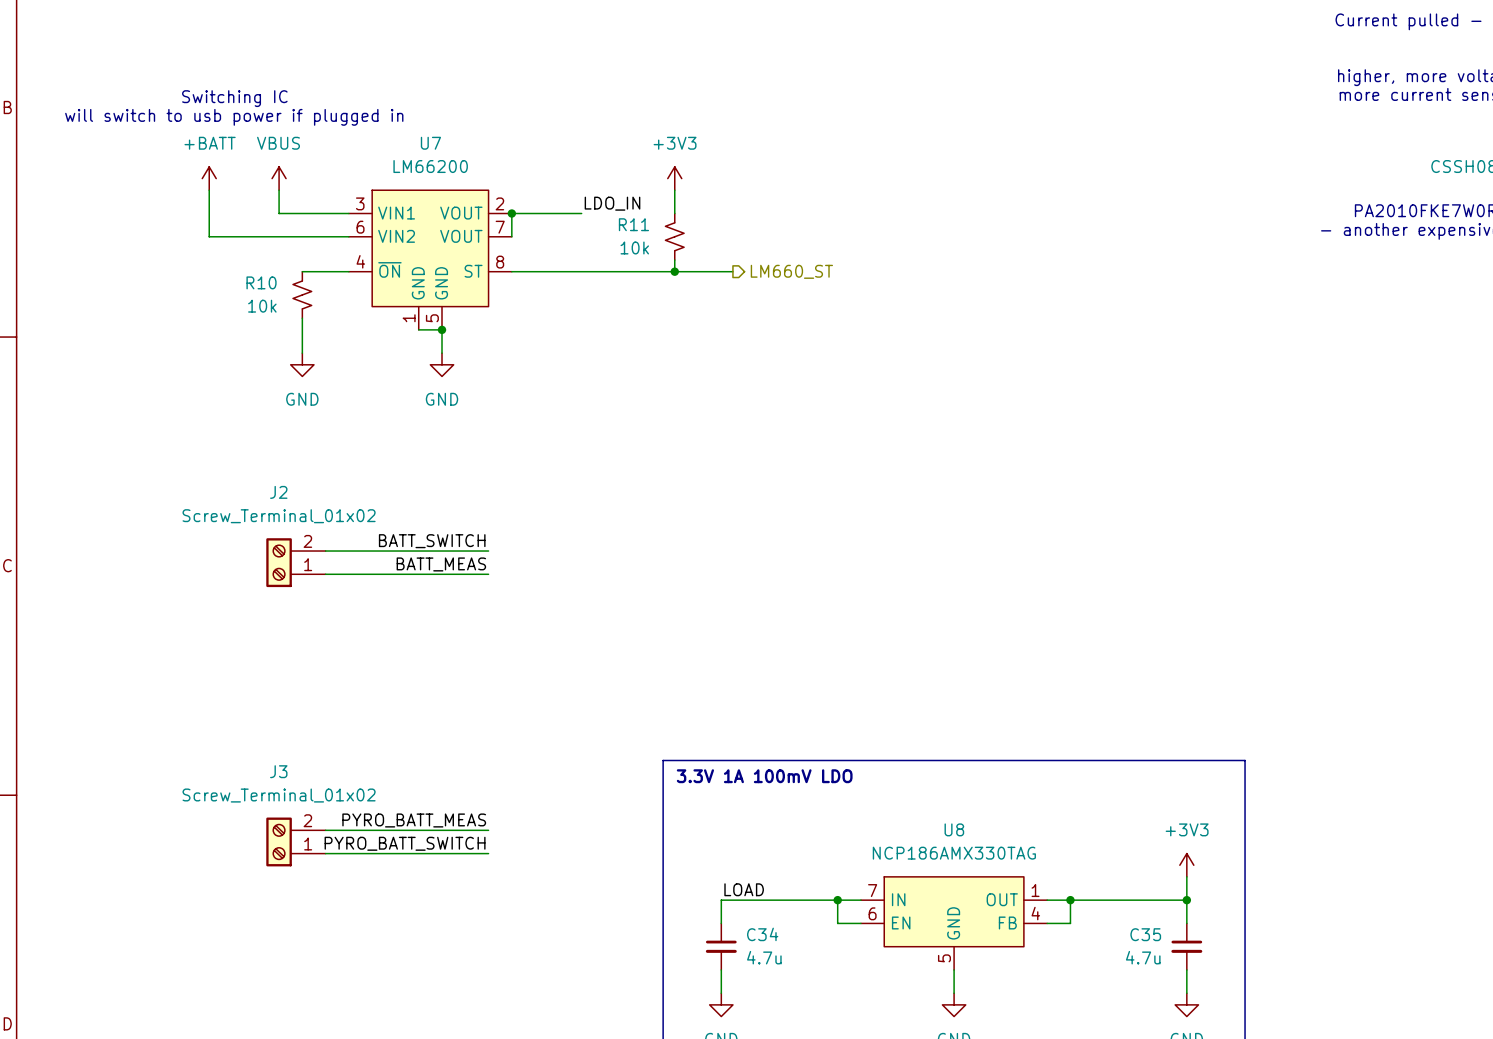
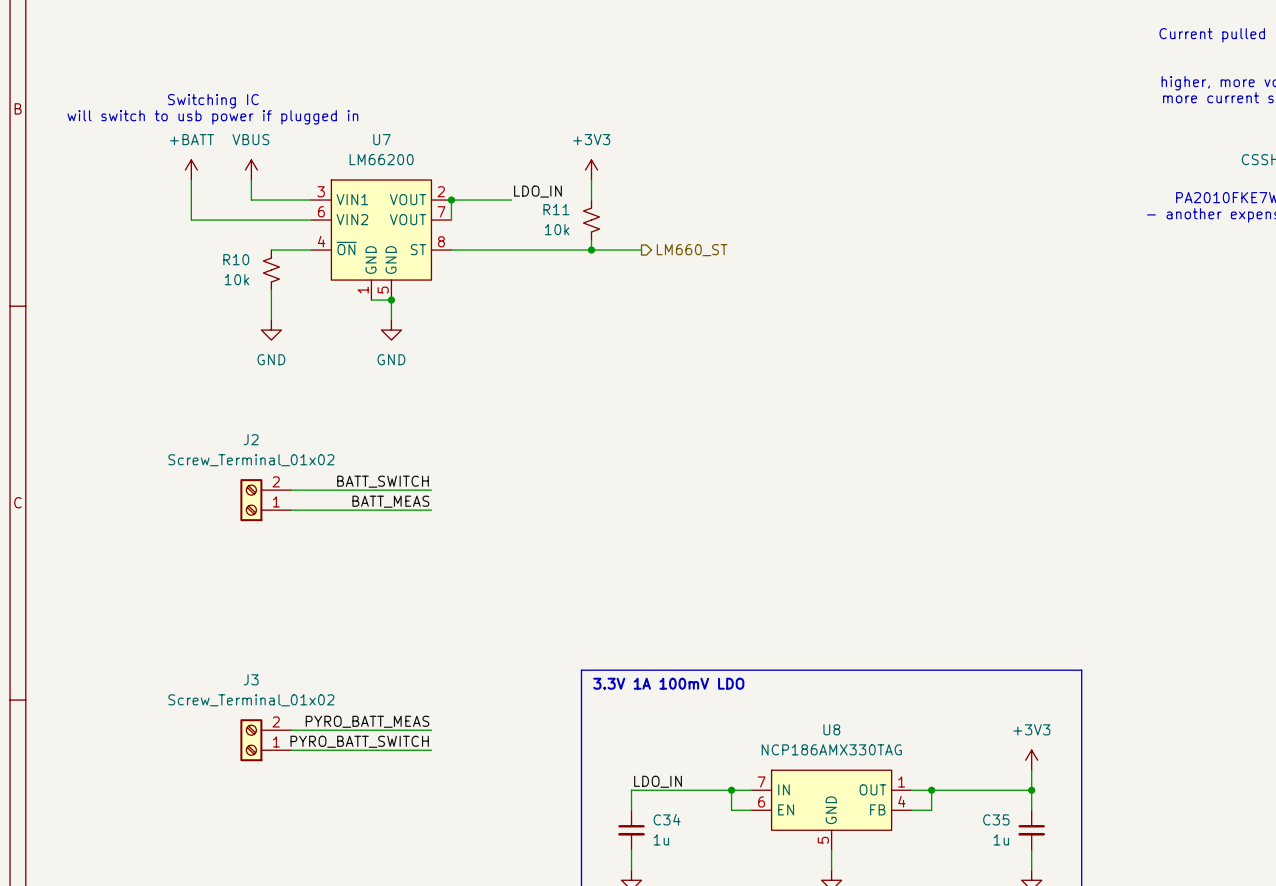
label: LOAD (744, 889) -> LDO_IN (658, 781)
C34 value: 4.7u (764, 957) -> 1u (661, 839)
C35 value: 4.7u (1143, 957) -> 1u (1001, 839)

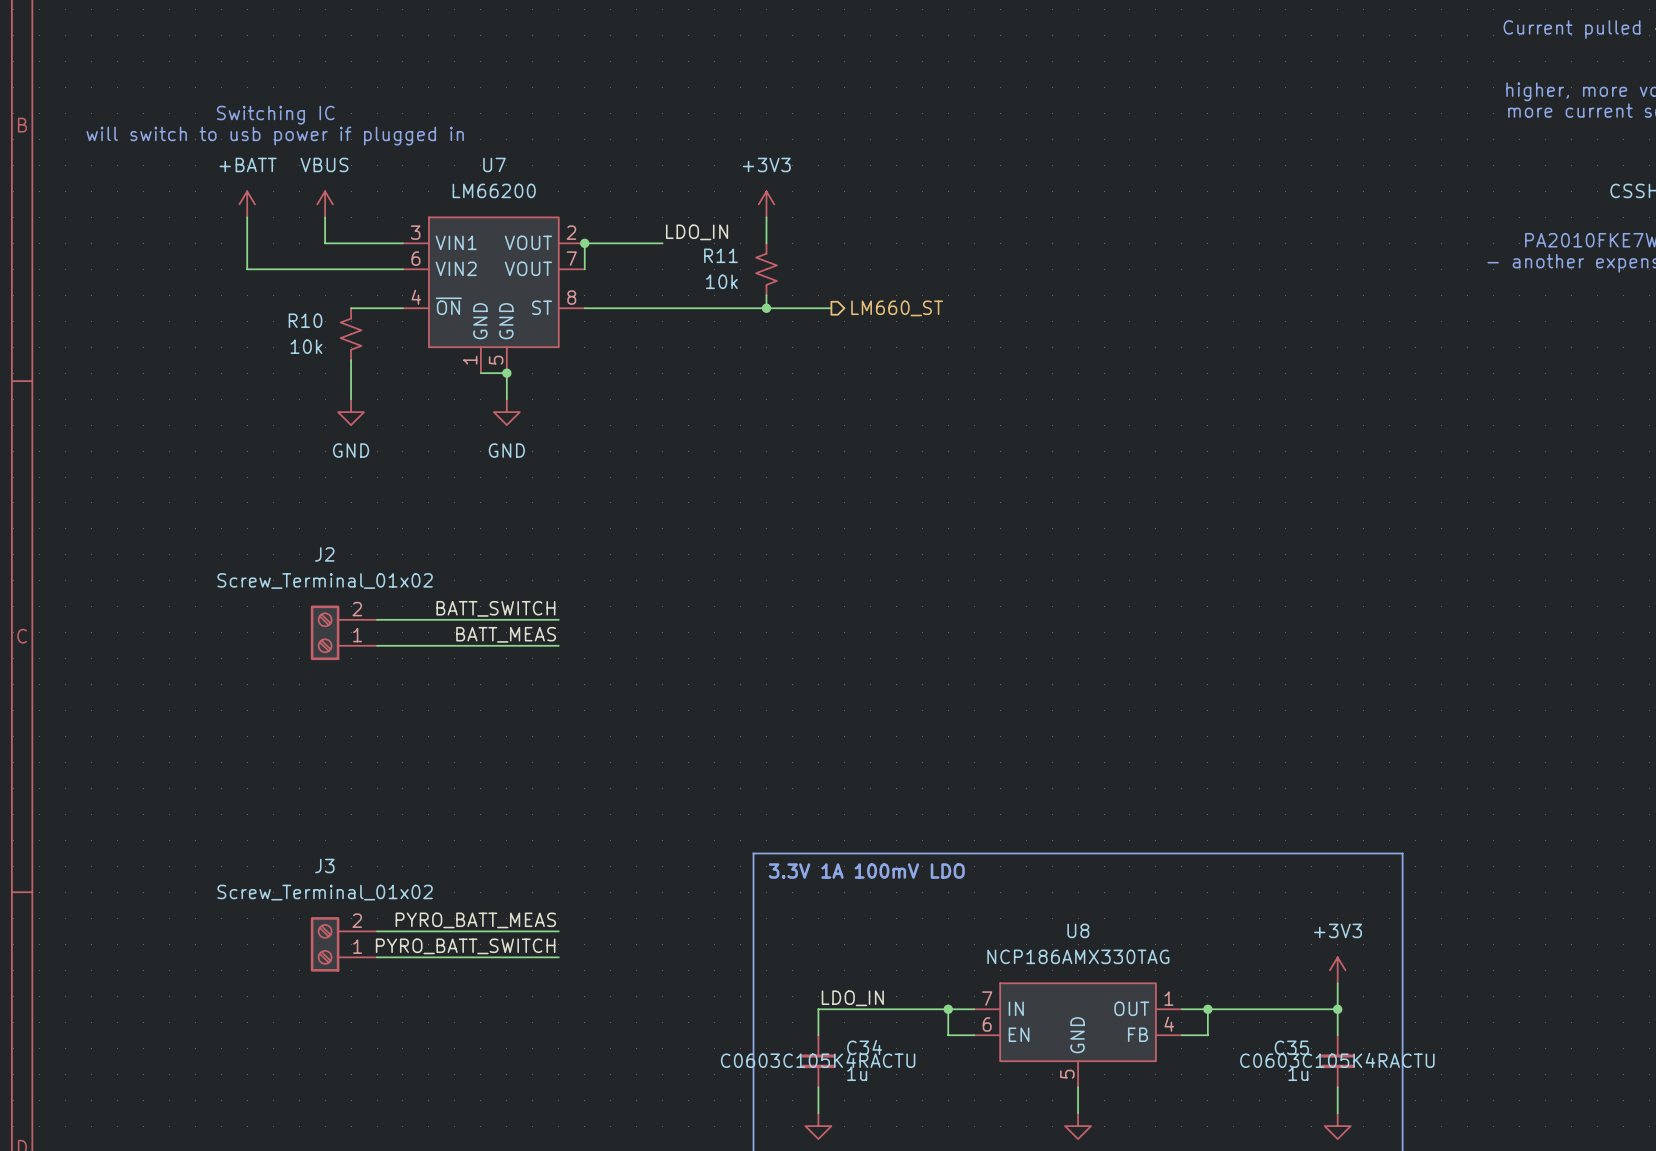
C34 text: none -> C0603C105K4RACTU (818, 1060)
C35 text: none -> C0603C105K4RACTU (1337, 1060)

